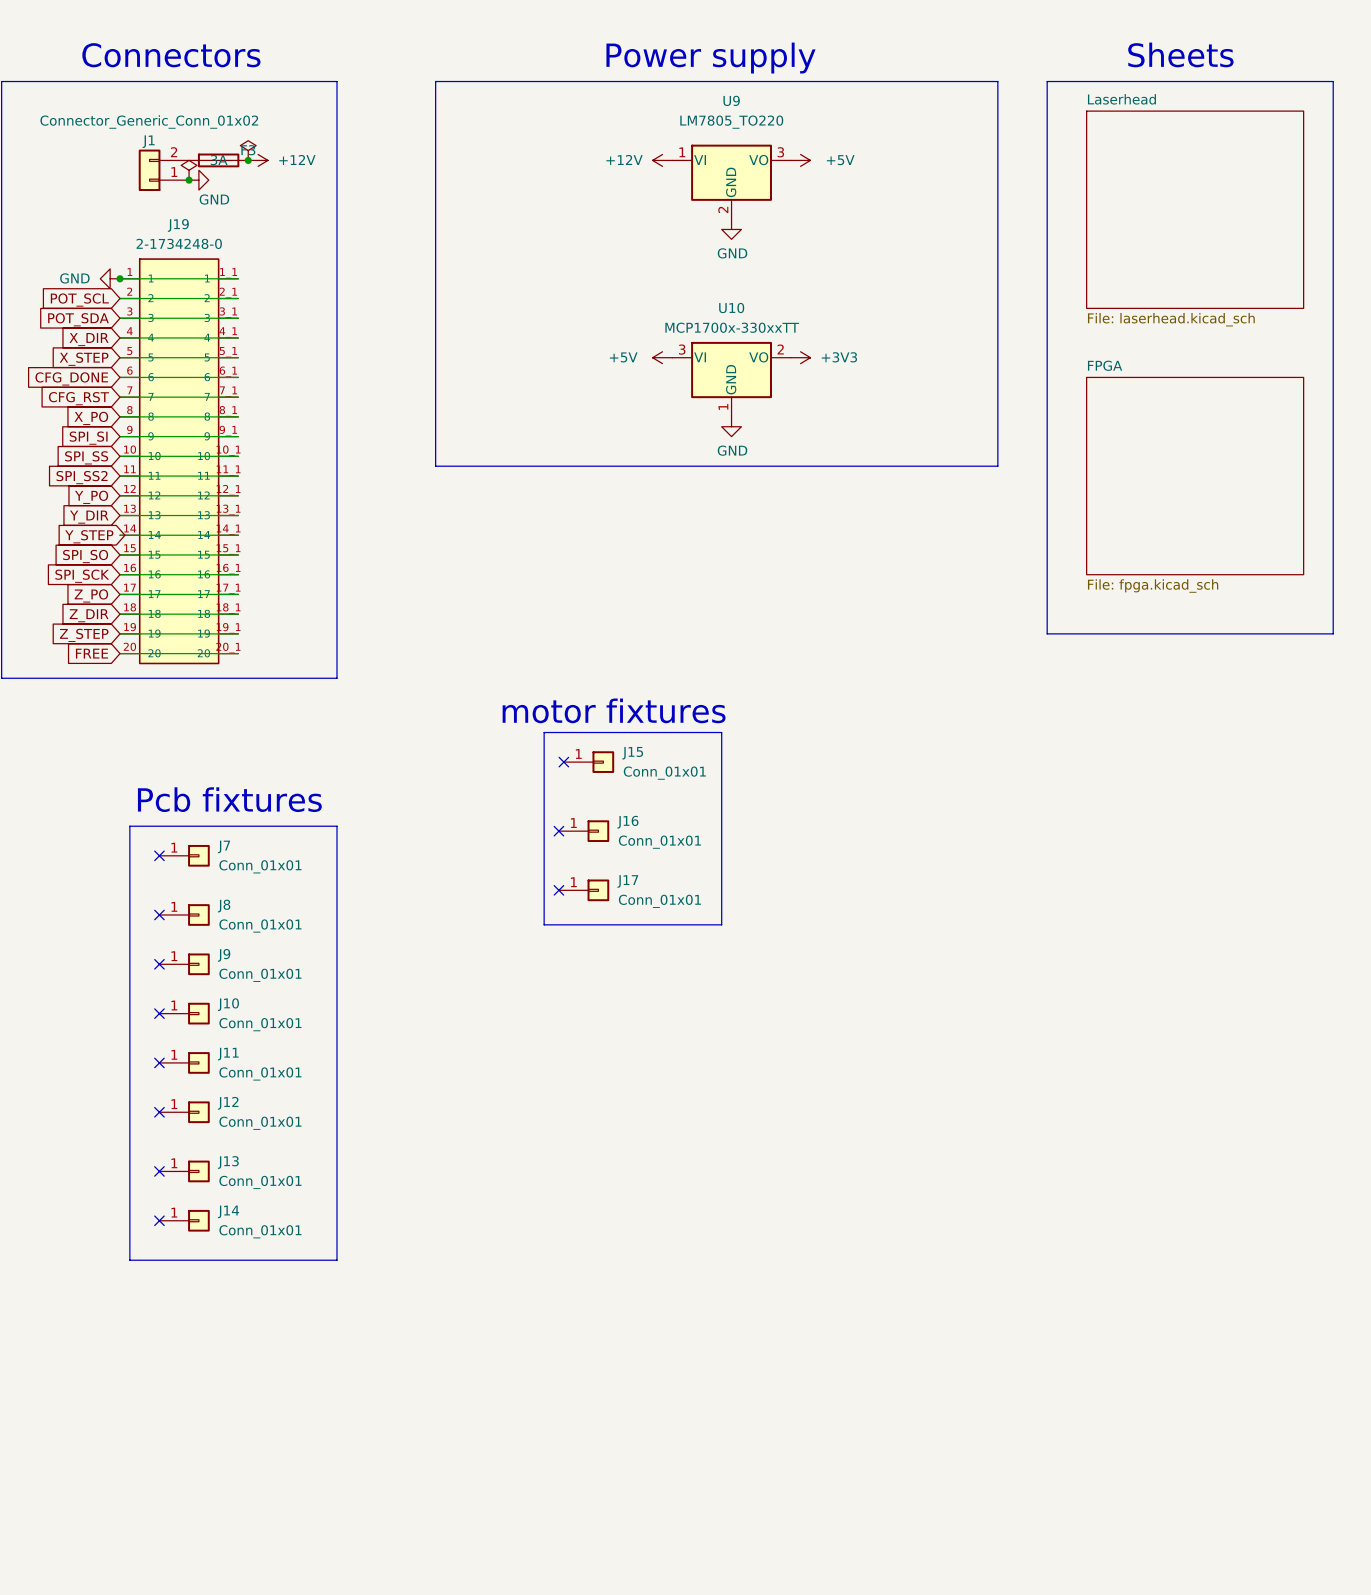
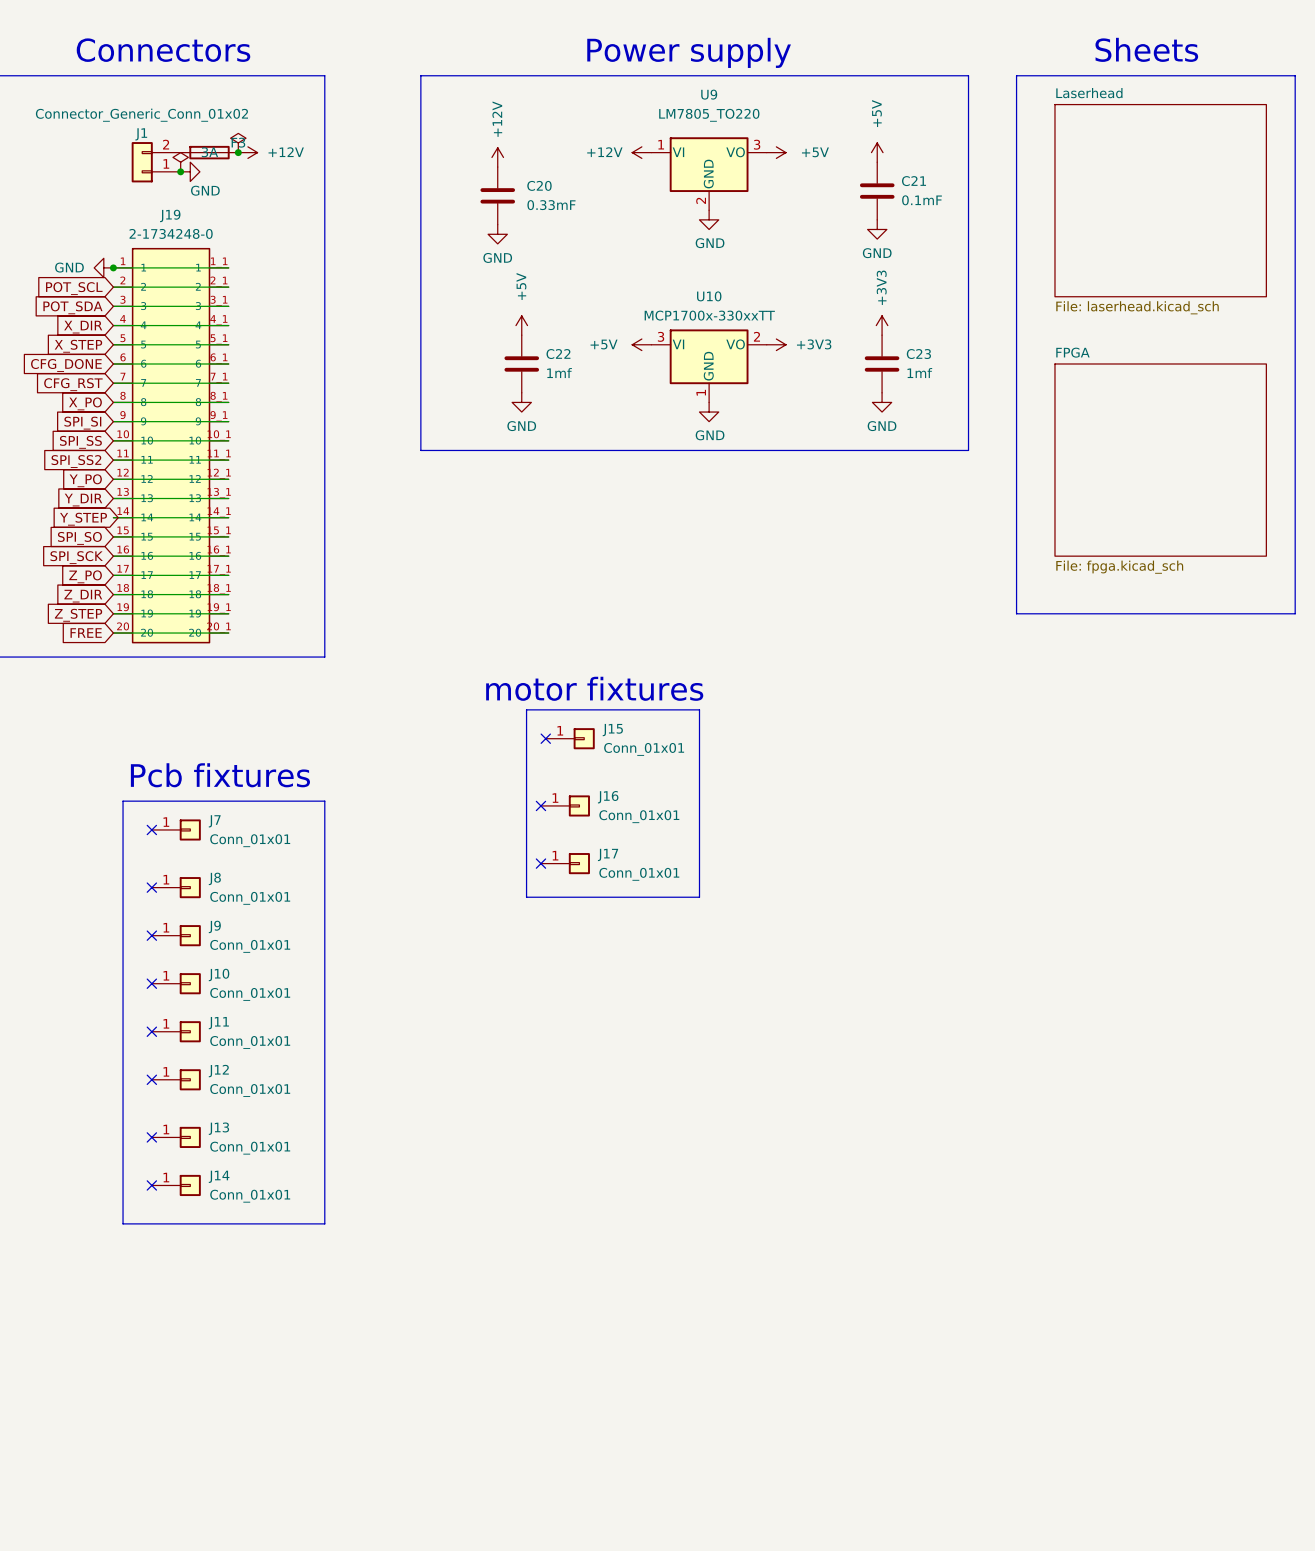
power symbol: none -> +5V (877, 152)
power symbol: none -> +12V (497, 157)
C21: none -> 0.1mF (877, 191)
C20: none -> 0.33mF (497, 195)
power symbol: none -> GND (877, 229)
power symbol: none -> GND (497, 234)
power symbol: none -> +5V (521, 325)
power symbol: none -> +3V3 (882, 325)
C22: none -> 1mf (521, 363)
C23: none -> 1mf (882, 363)
power symbol: none -> GND (521, 402)
power symbol: none -> GND (882, 402)

